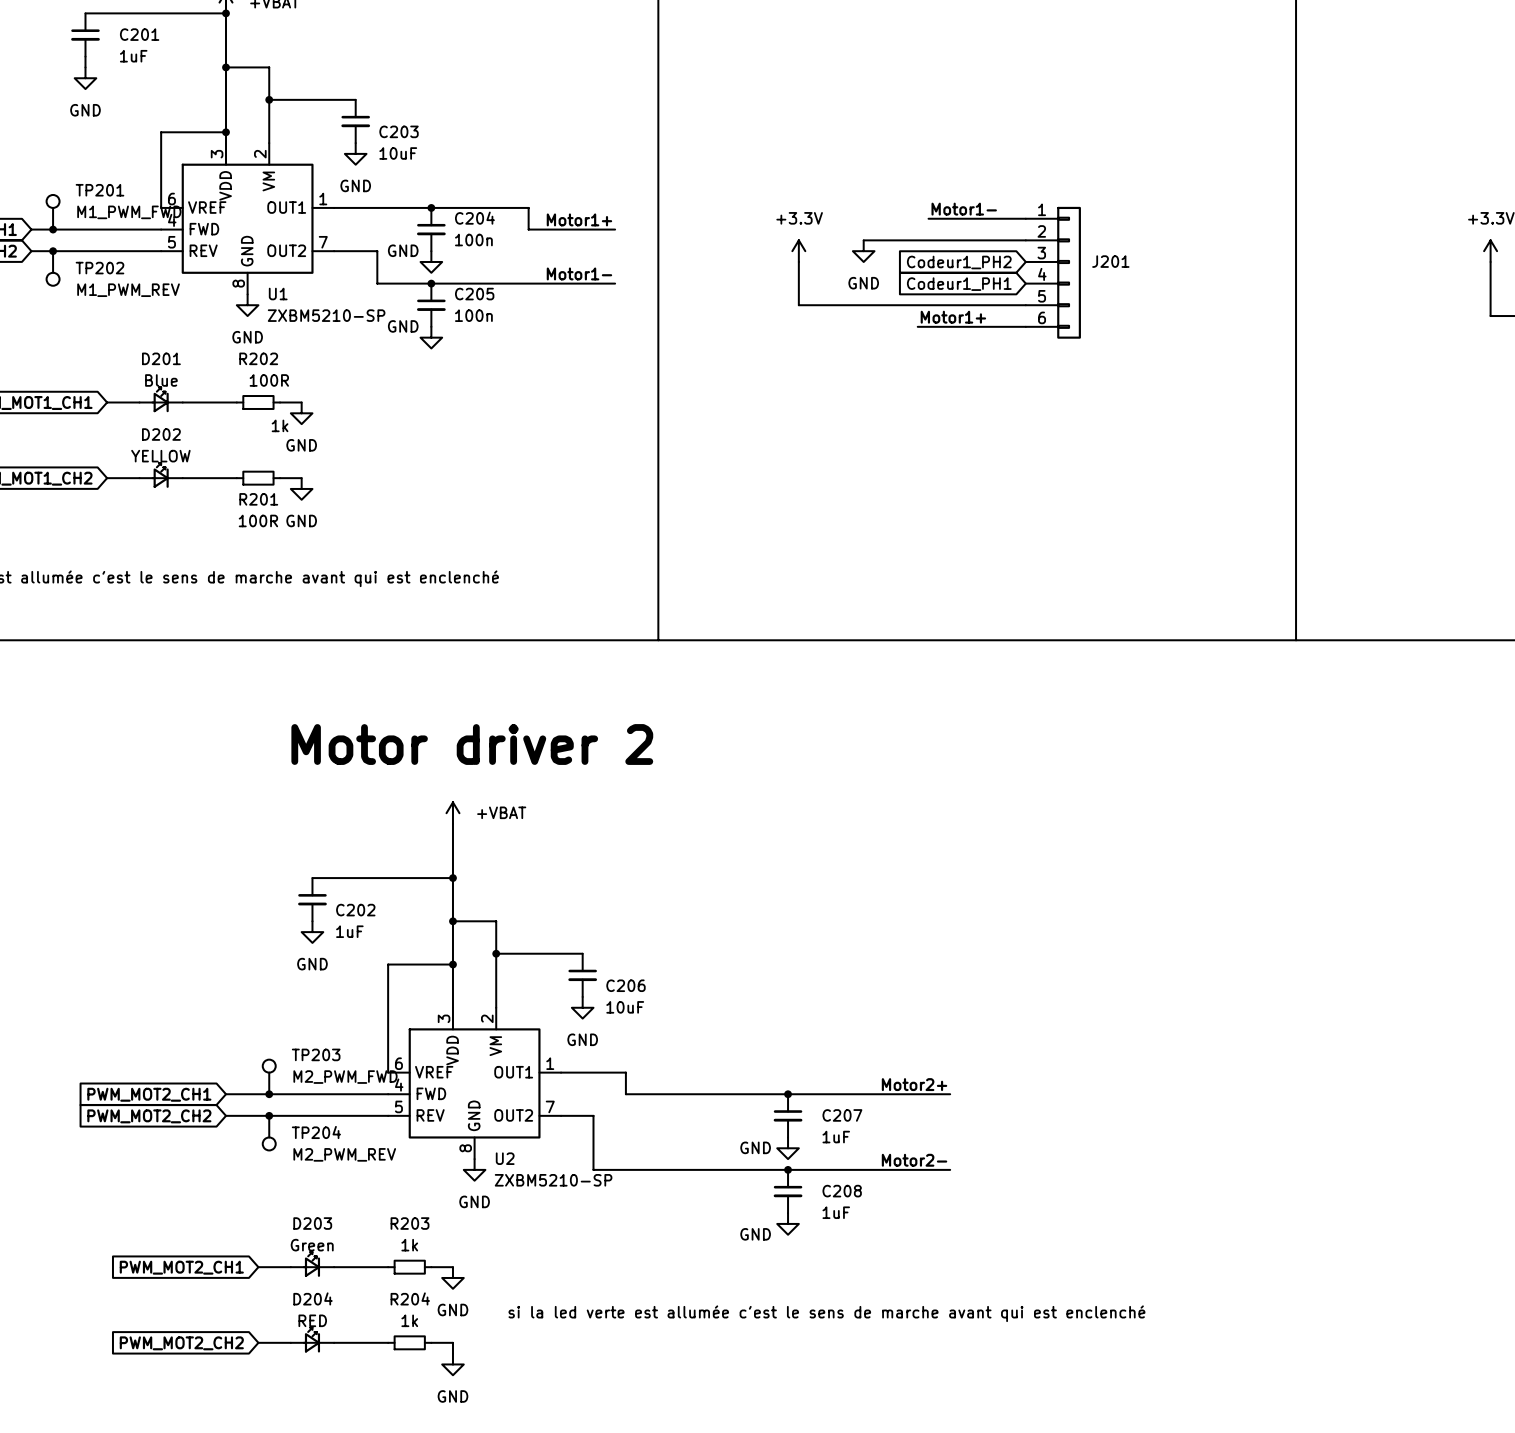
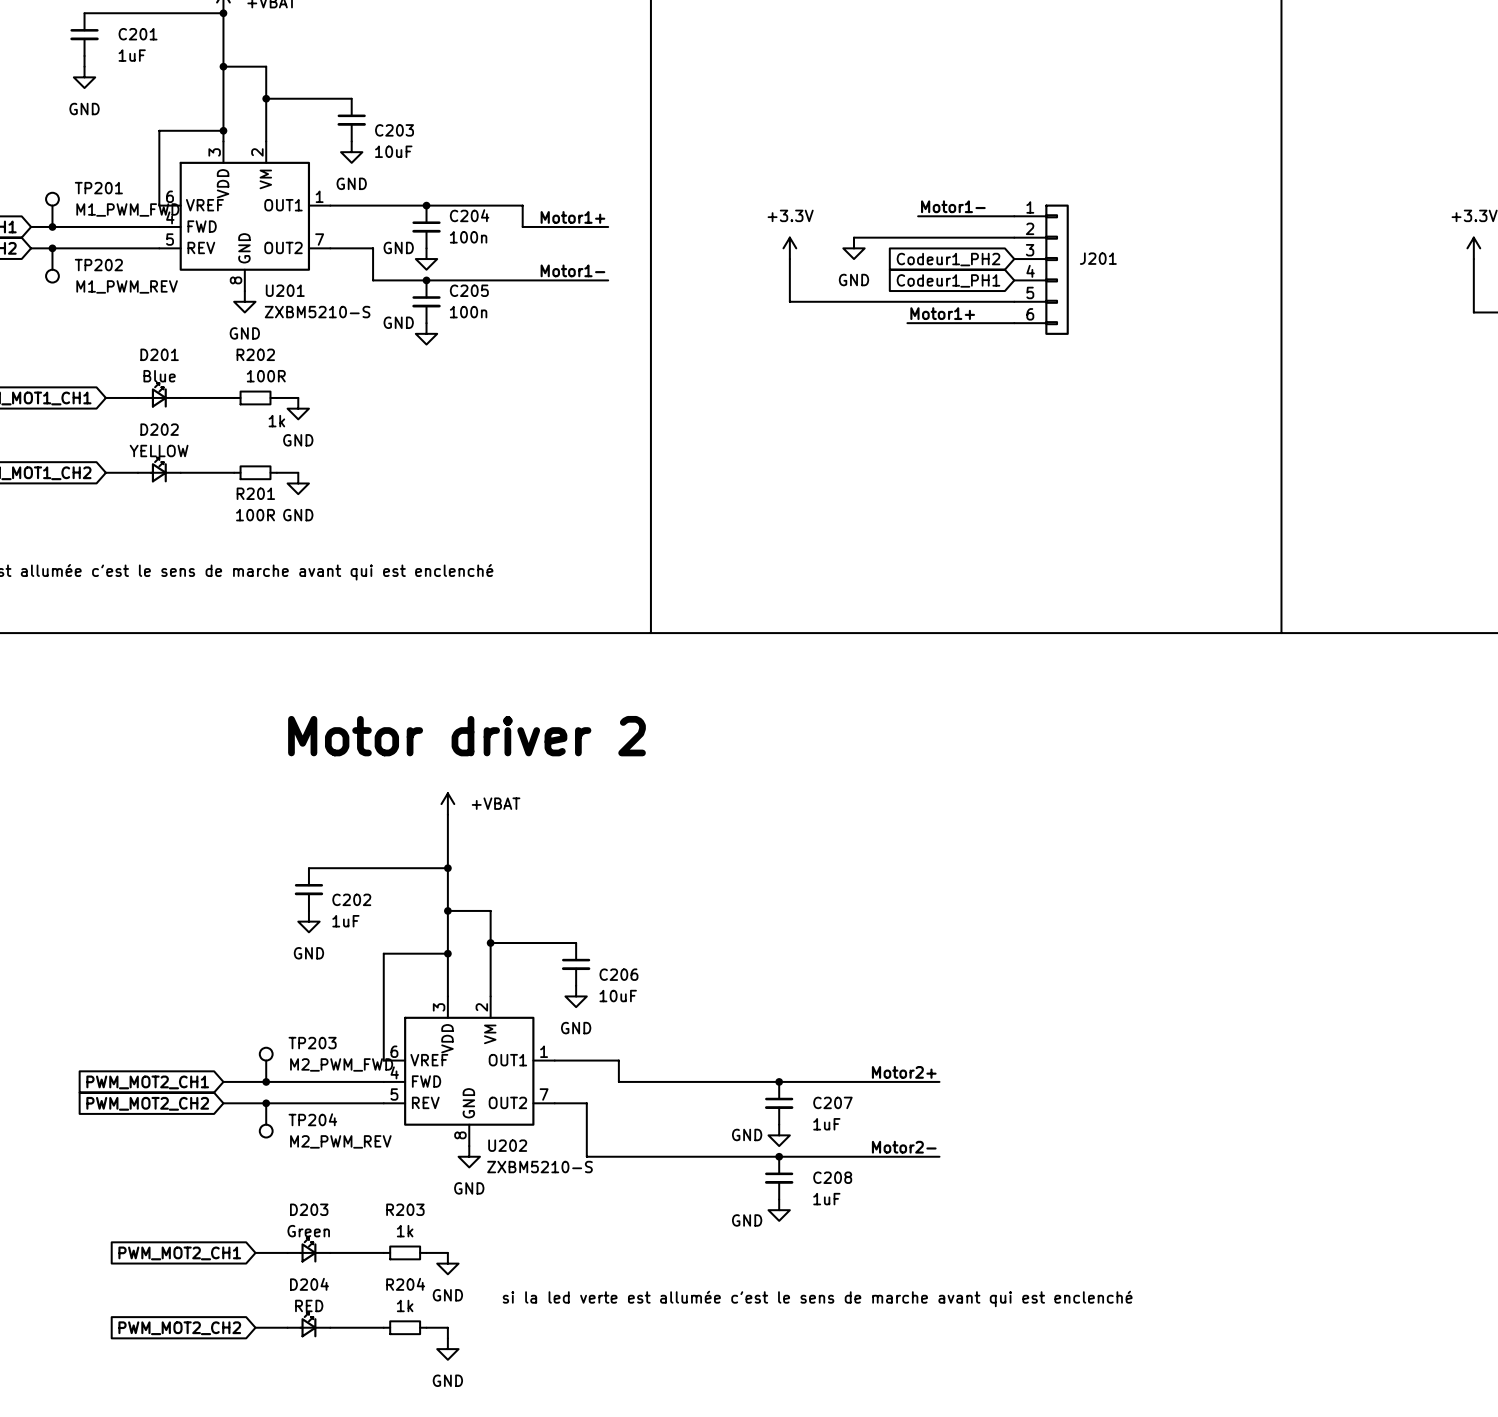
U1 name: U1 (278, 294) -> U201 (285, 290)
U1 value: ZXBM5210-SP (326, 315) -> ZXBM5210-S (317, 312)
U2 name: U2 (505, 1158) -> U202 (507, 1145)
U2 value: ZXBM5210-SP (553, 1180) -> ZXBM5210-S (540, 1167)

